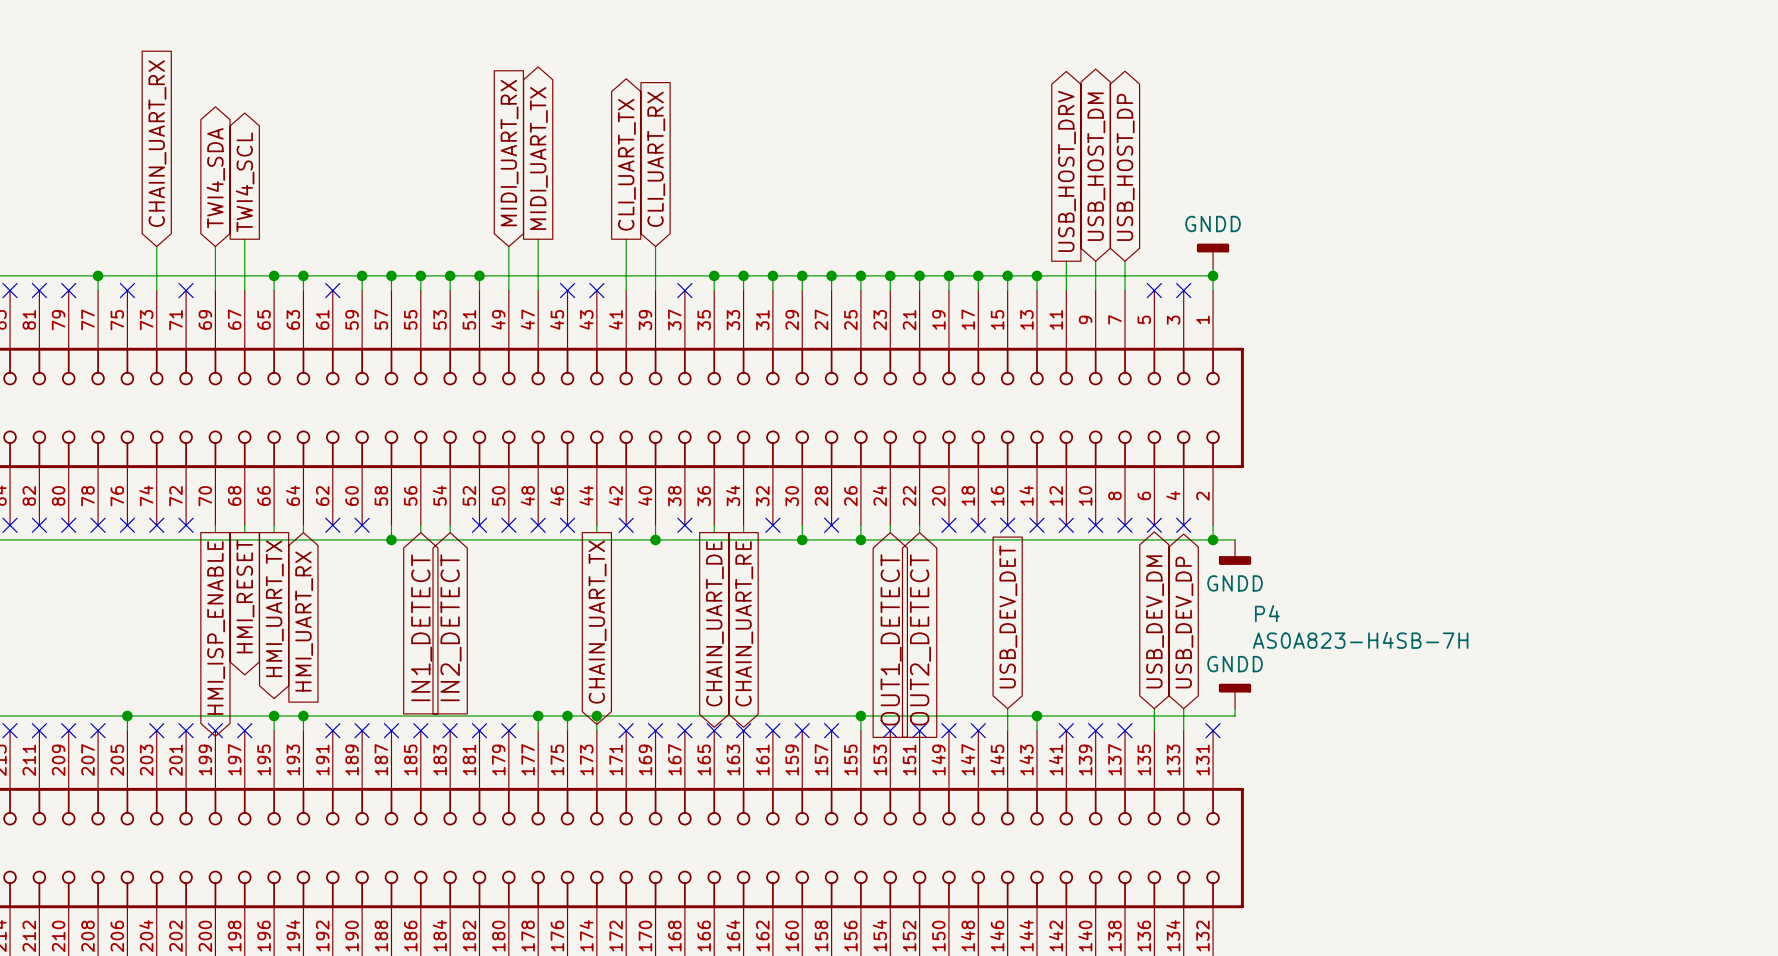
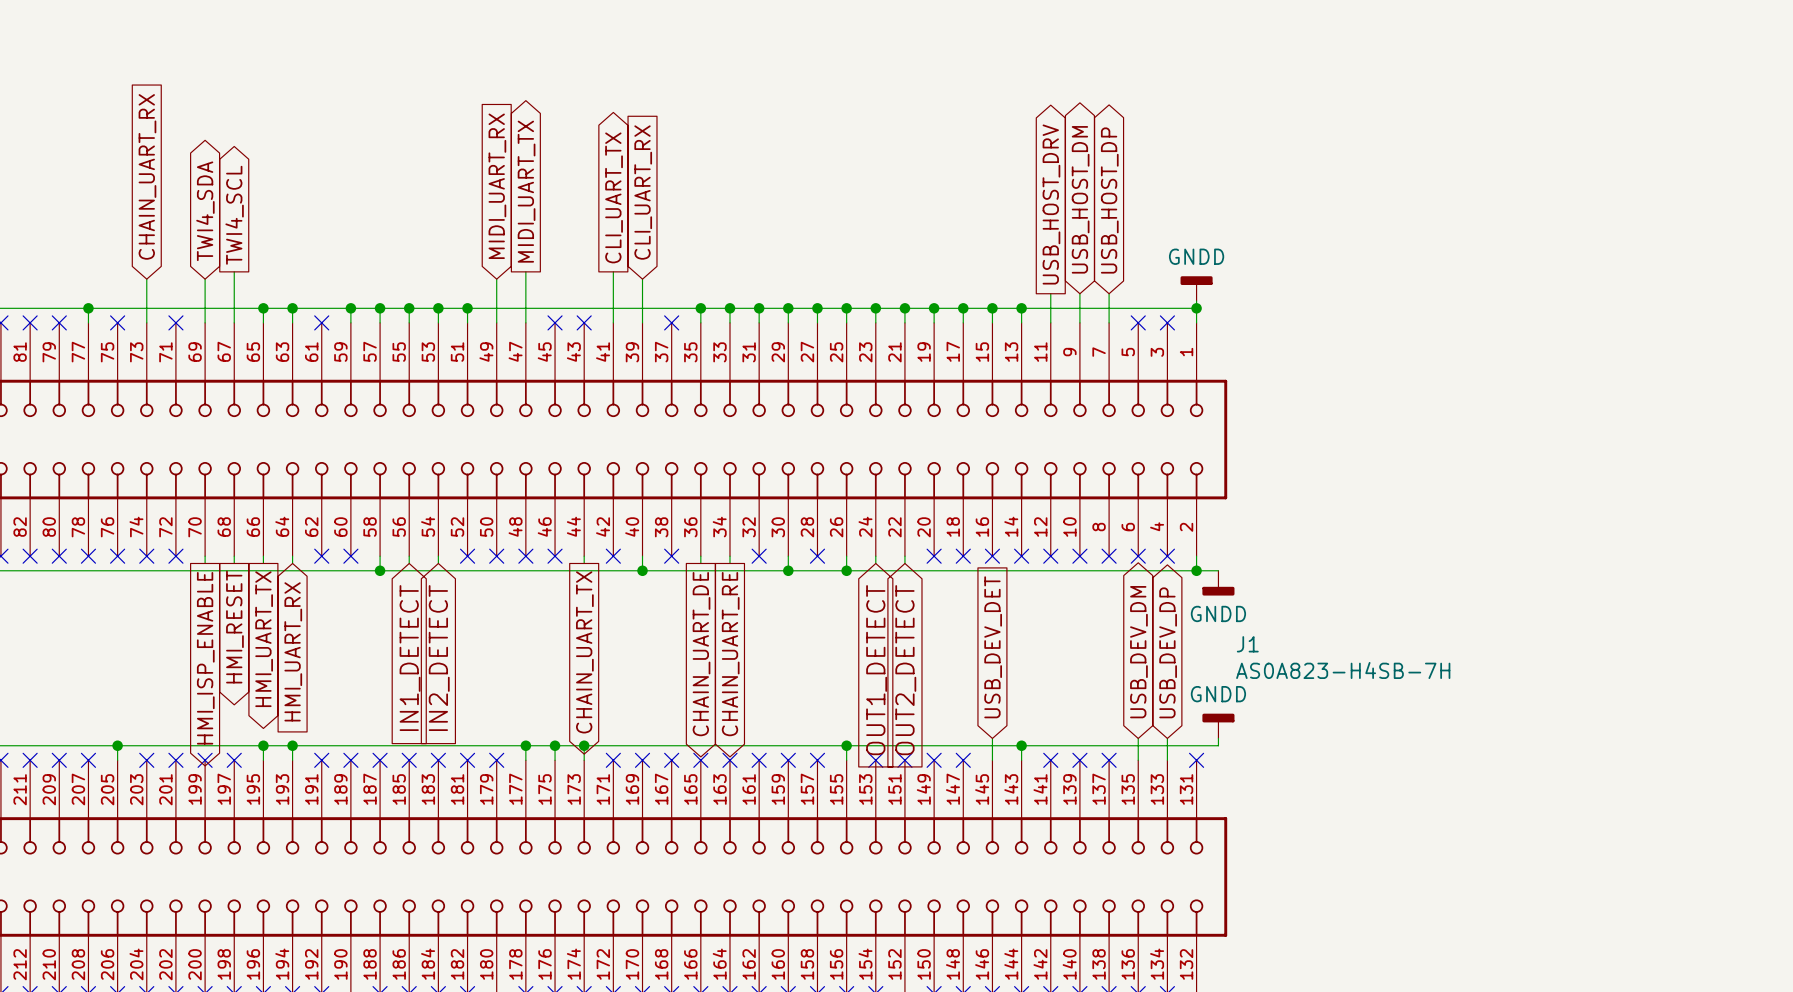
P4 name: P4 (1267, 613) -> J1 (1247, 644)

